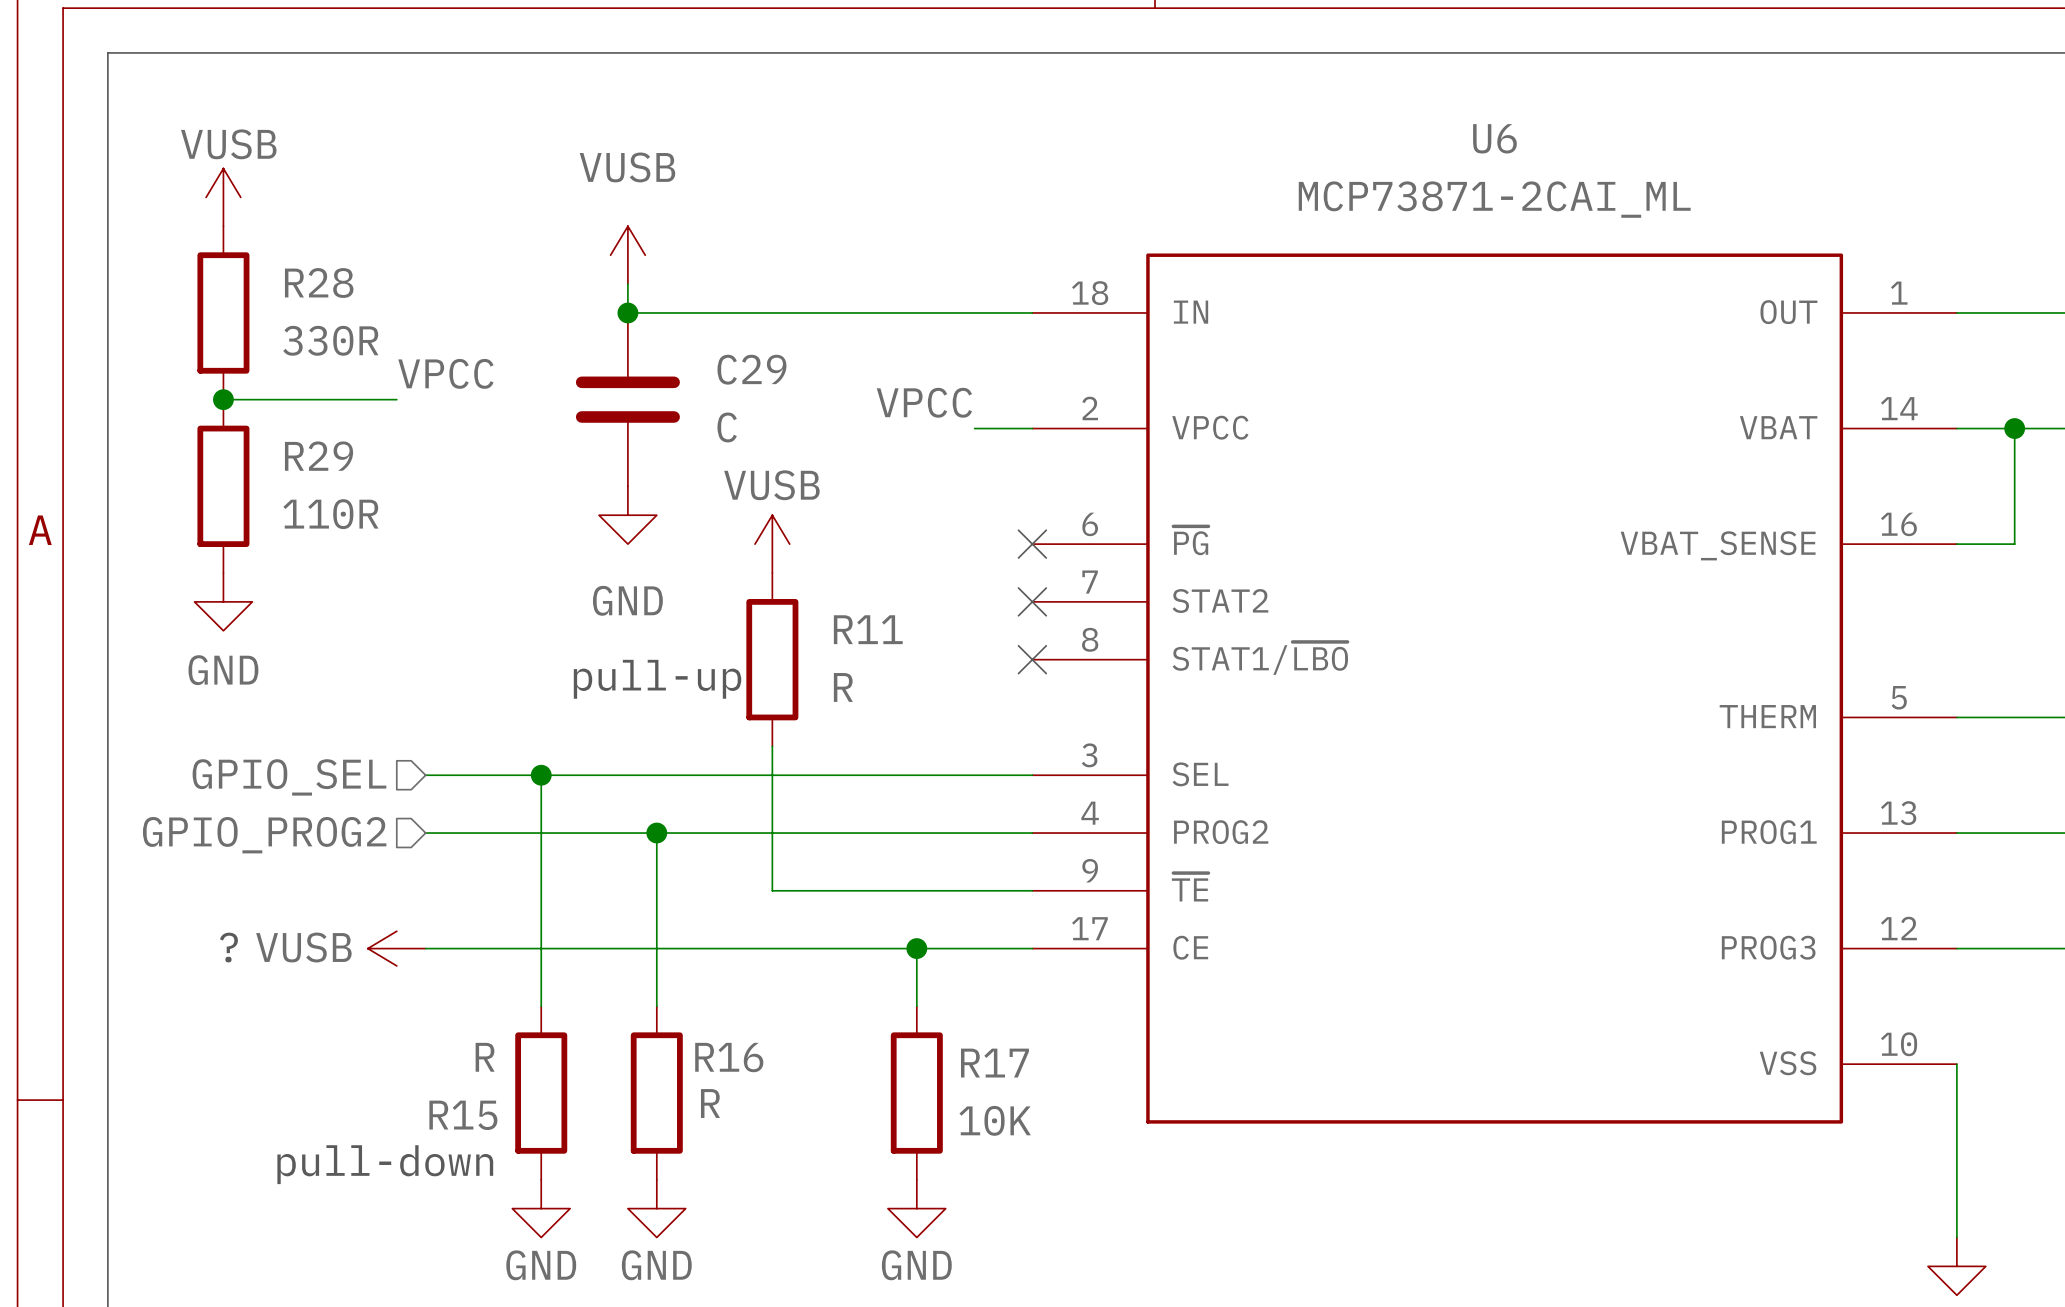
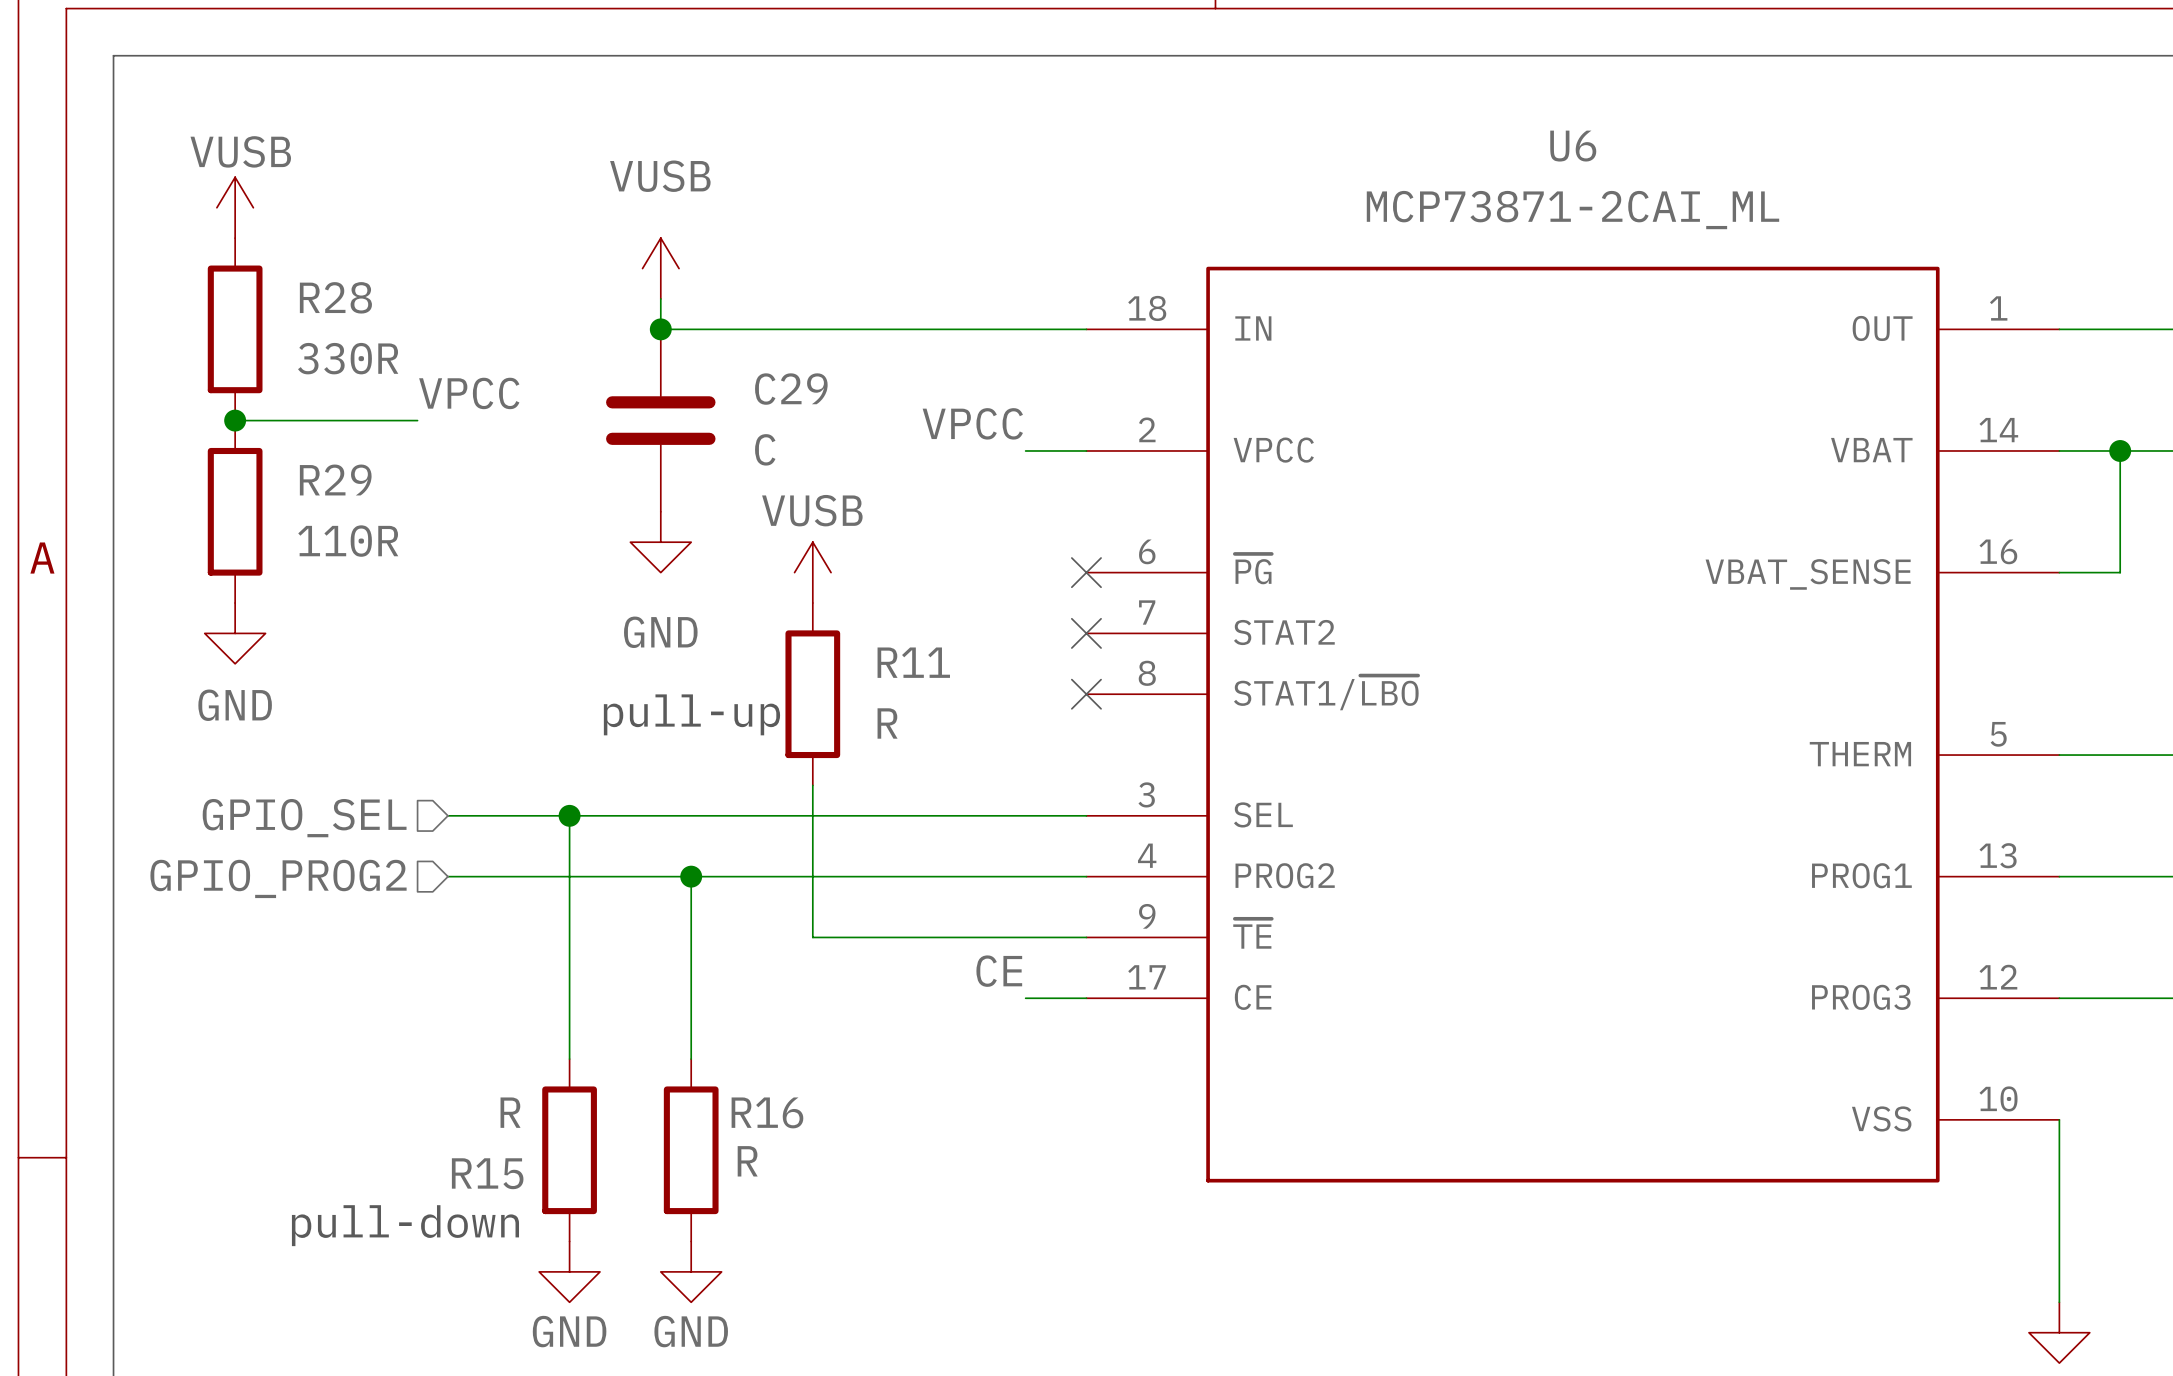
label: none -> CE (999, 971)
text: ? (228, 947) -> none
power symbol: VUSB (396, 948) -> none
wire: (425, 948) (974, 948) -> none
wire: (916, 948) (916, 1006) -> none
junction: (916, 948) -> none
R17: 10K (916, 1093) -> none
power symbol: GND (916, 1208) -> none

